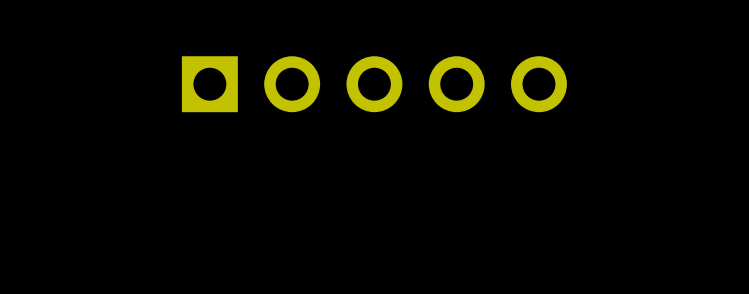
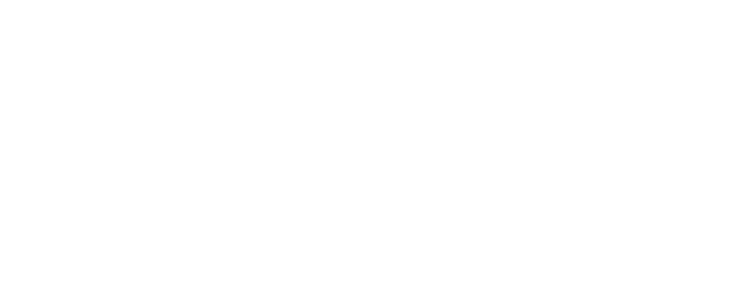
part: (374, 84) -> none

